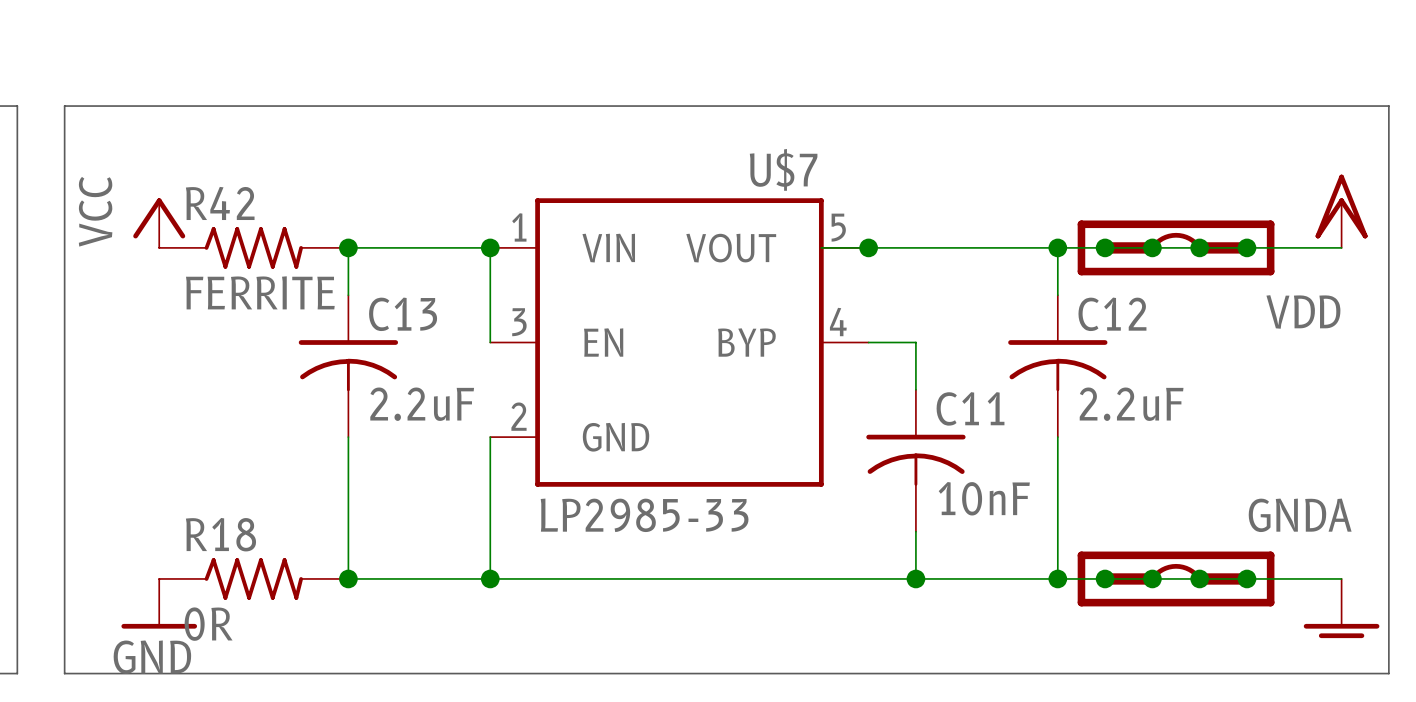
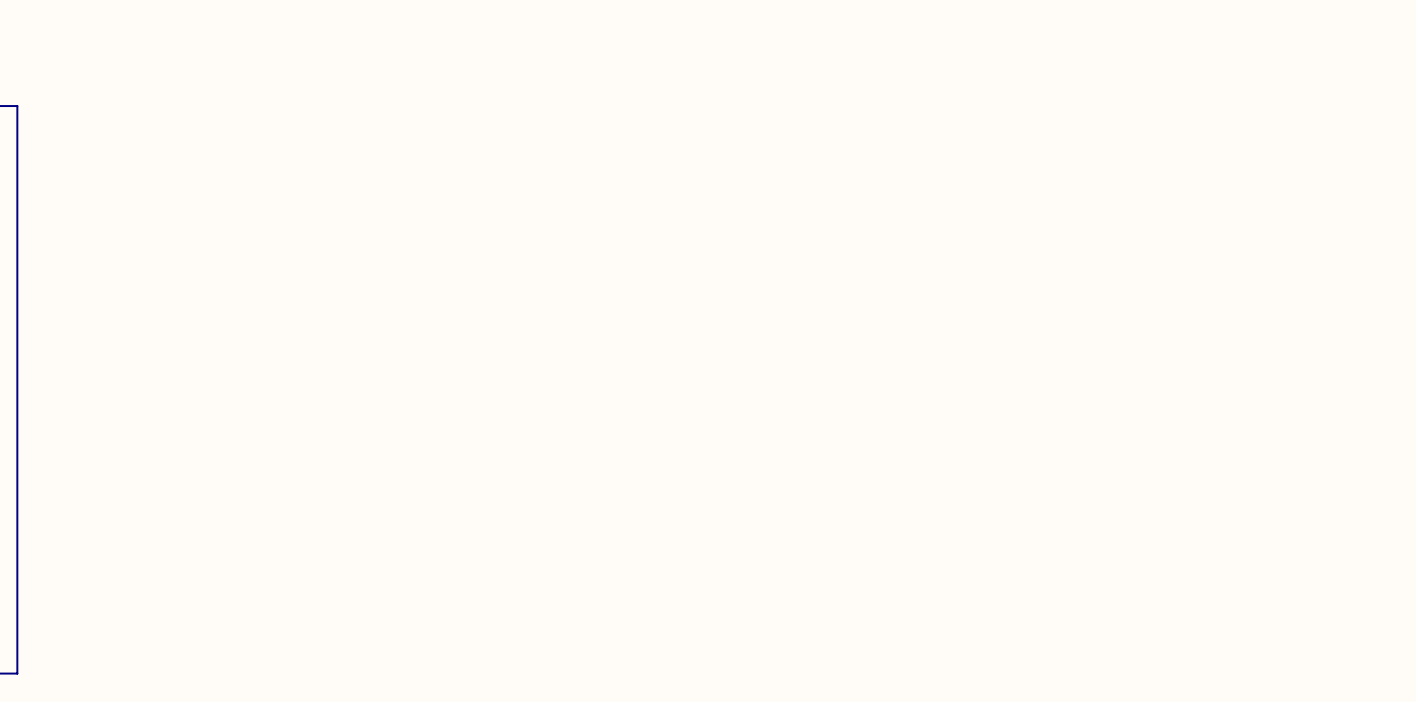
bus: (64, 106) (1388, 106) (1388, 673) (64, 673) (64, 106) -> none
power symbol: VDD (1341, 211) -> none
power symbol: VCC (159, 223) -> none
R42: FERRITE (253, 247) -> none
junction: (348, 247) -> none
junction: (490, 247) -> none
wire: (821, 247) (1341, 247) -> none
junction: (868, 247) -> none
wire: (1057, 247) (1057, 295) -> none
junction: (1057, 247) -> none
junction: (1105, 247) -> none
junction: (1152, 247) -> none
part: (1176, 247) -> none
junction: (1199, 247) -> none
junction: (1246, 247) -> none
wire: (348, 295) (348, 247) (490, 247) (490, 342) -> none
U$7: LP2985-33 (679, 342) -> none
wire: (868, 342) (915, 342) (915, 389) -> none
C13: 2.2uF (348, 366) -> none
C12: 2.2uF (1057, 366) -> none
wire: (348, 437) (348, 578) (1341, 578) -> none
wire: (490, 437) (490, 578) -> none
wire: (1057, 437) (1057, 578) -> none
C11: 10nF (915, 460) -> none
wire: (915, 531) (915, 578) -> none
R18: 0R (253, 578) -> none
junction: (348, 578) -> none
junction: (490, 578) -> none
junction: (915, 578) -> none
junction: (1057, 578) -> none
junction: (1105, 578) -> none
junction: (1152, 578) -> none
part: (1176, 578) -> none
junction: (1199, 578) -> none
junction: (1246, 578) -> none
power symbol: GND (159, 603) -> none
power symbol: GNDA (1341, 608) -> none

